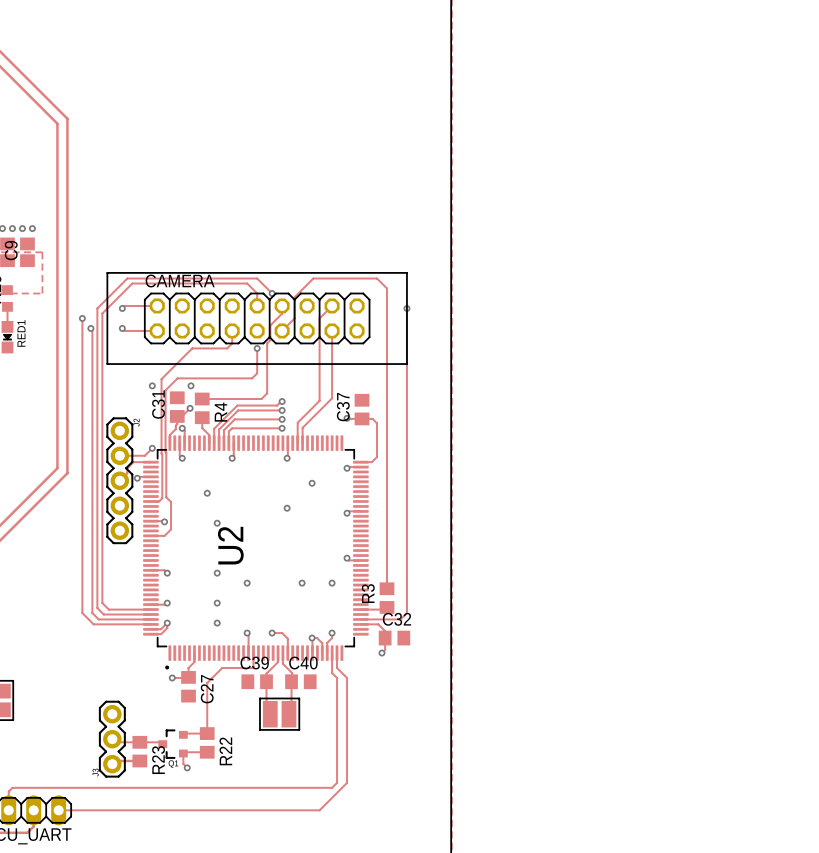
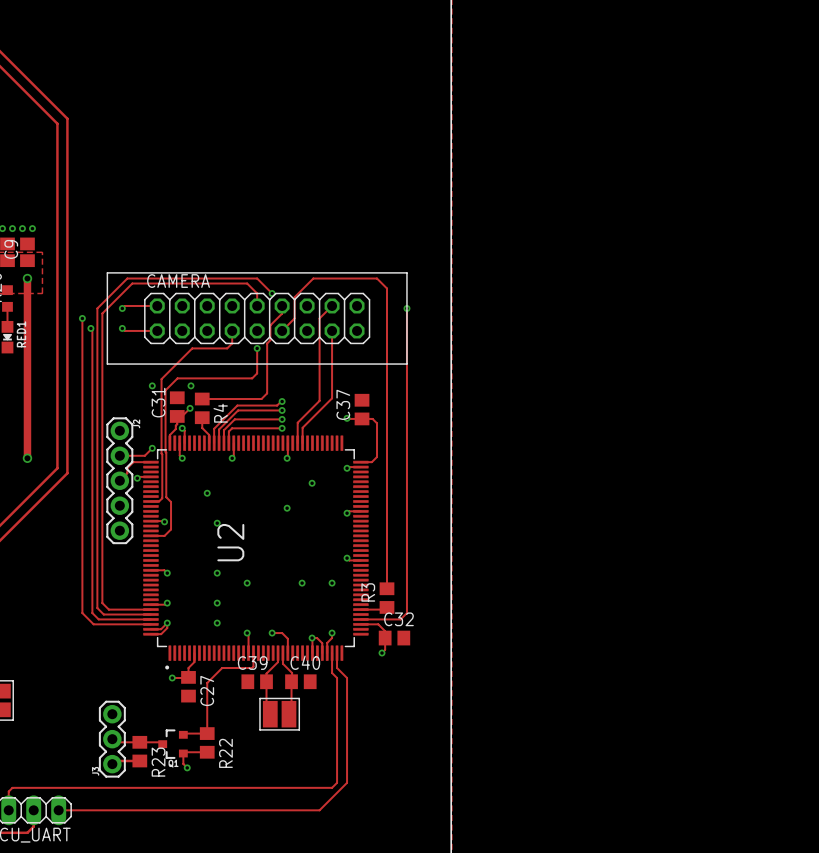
track: none -> (27, 278) (27, 458)
via: none -> (27, 278)
via: none -> (27, 458)

